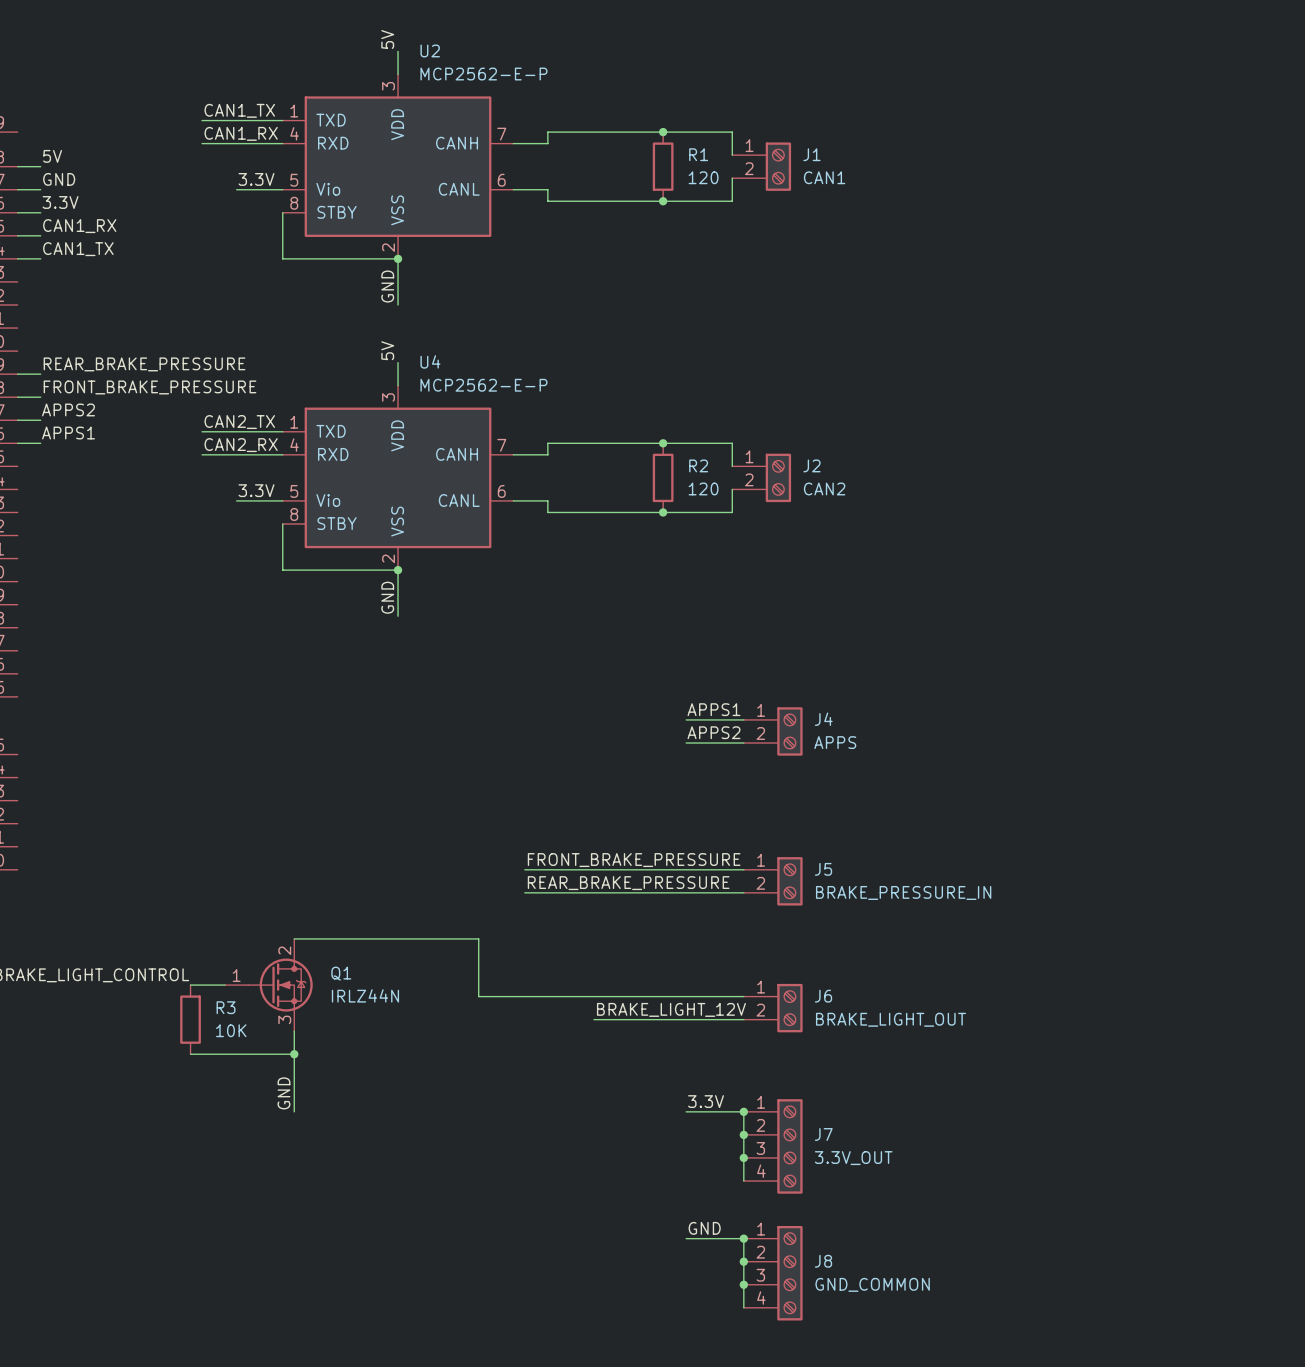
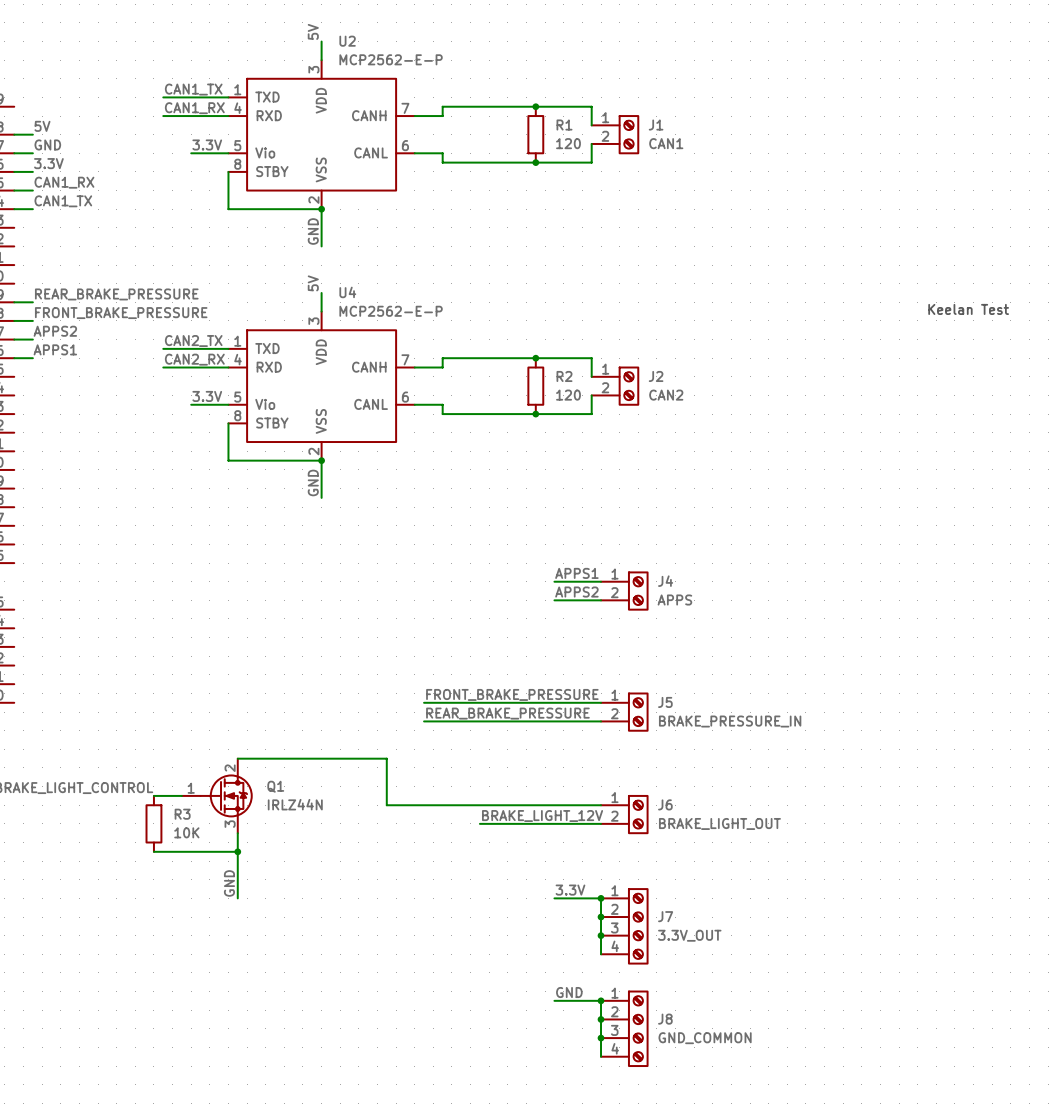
text: none -> Keelan Test (968, 309)

